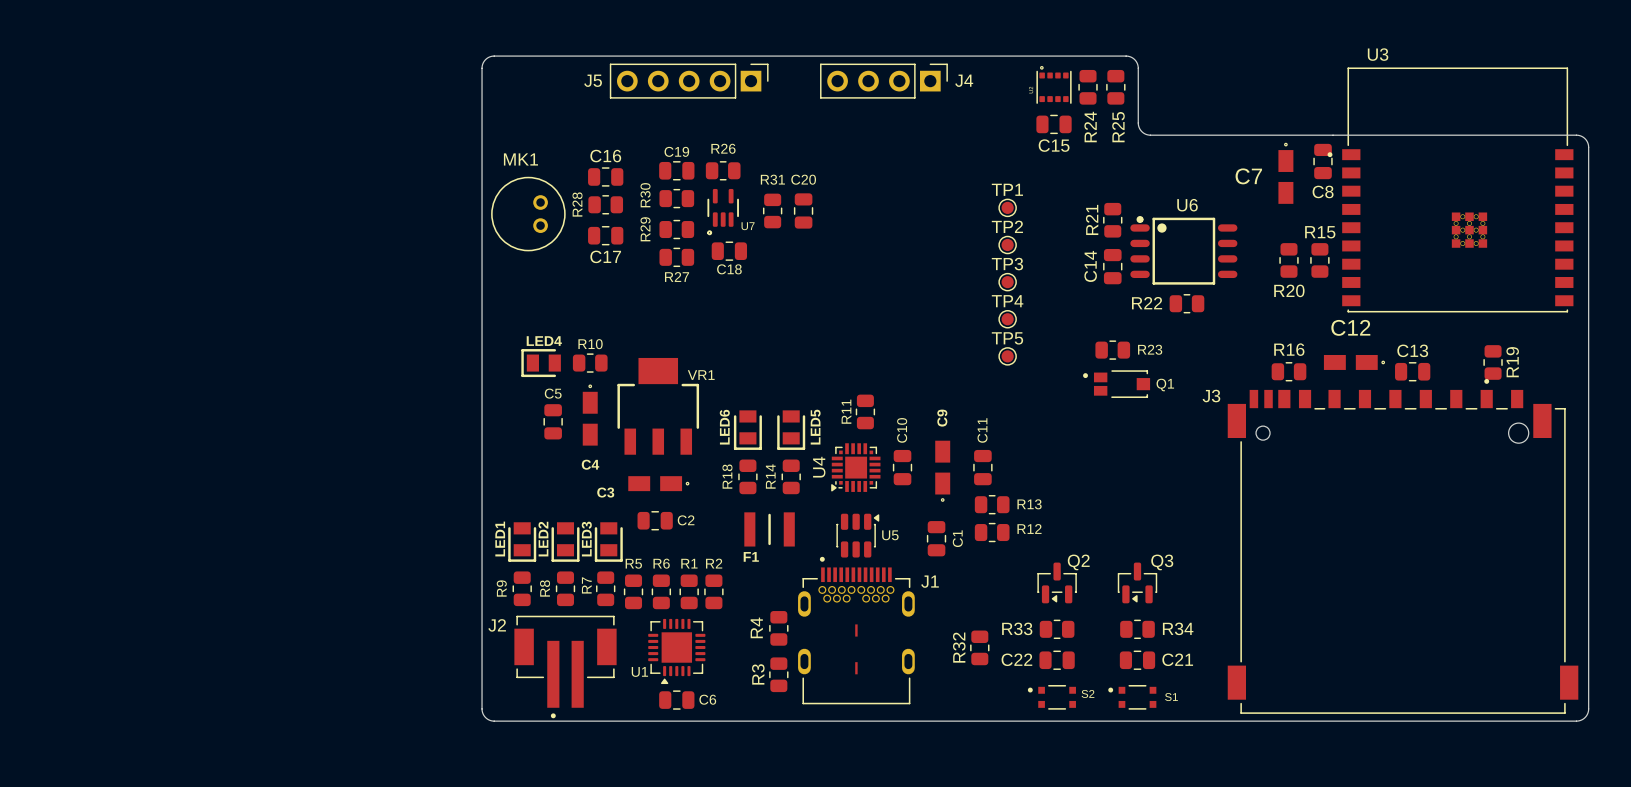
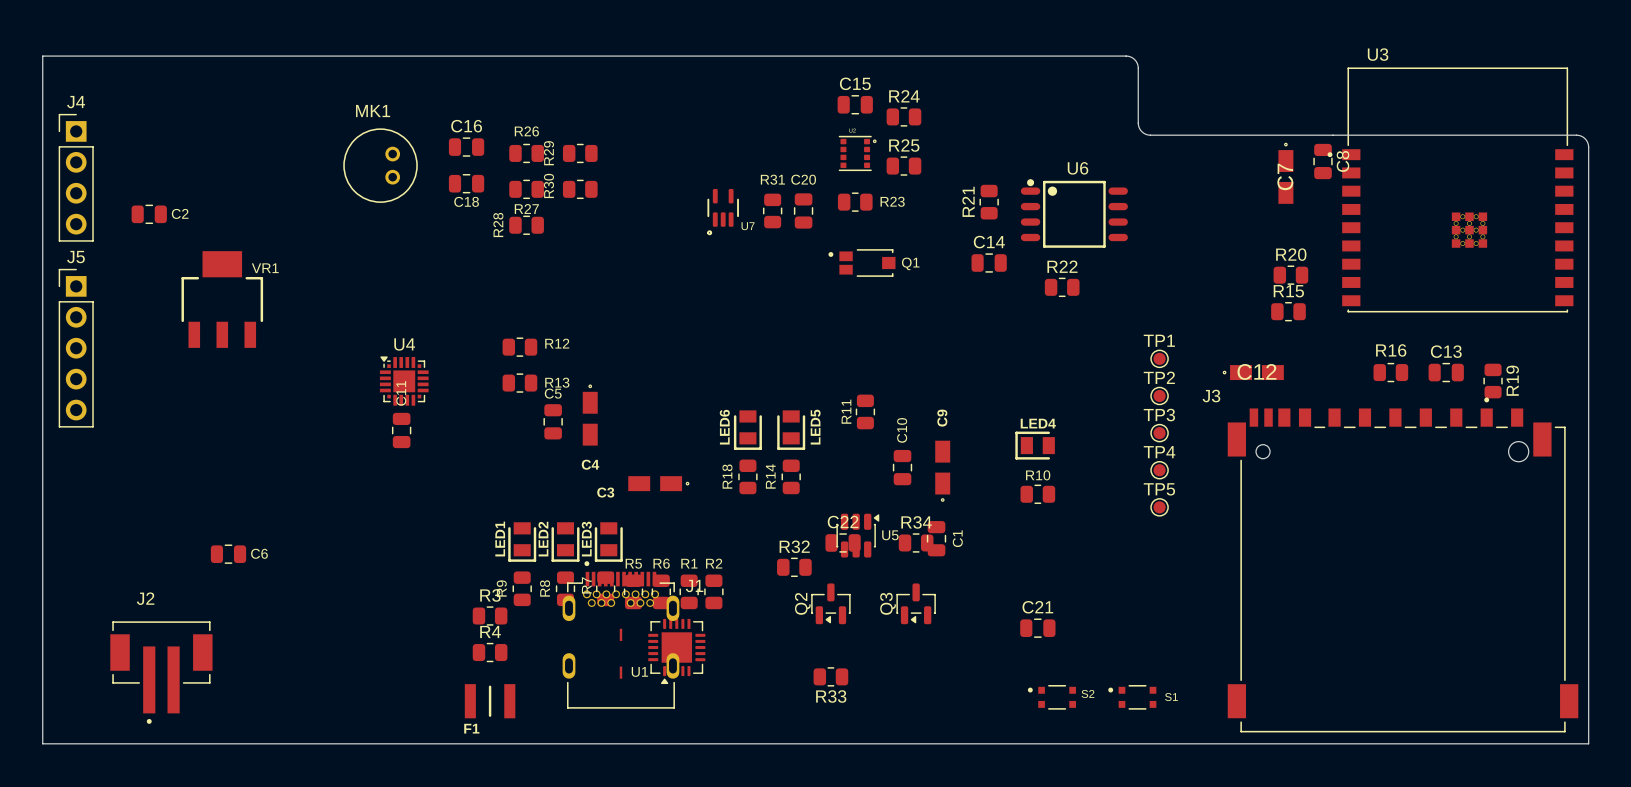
board edge: (494, 56) (485, 59) (482, 68) (482, 708) (487, 719) (494, 721) (1576, 721) (1585, 717) (1588, 708) -> (494, 56) (42, 56) (42, 743) (1588, 743) (1588, 708)
J5 name position: J5 (593, 80) -> J5 (75, 257)
J5 rotation: 0° (689, 81) -> 90° counterclockwise (76, 348)
J5 position: (689, 81) -> (76, 348)
J4 rotation: 0° (883, 81) -> 90° counterclockwise (76, 177)
J4 position: (883, 81) -> (76, 177)
part rotation: 0° (1054, 84) -> 90° clockwise (857, 153)
part position: (1054, 84) -> (857, 153)
R24 rotation: 0° (1088, 87) -> 90° clockwise (903, 116)
R24 position: (1088, 87) -> (903, 116)
R25 rotation: 0° (1115, 87) -> 90° clockwise (903, 166)
R25 position: (1115, 87) -> (903, 166)
C15 position: (1054, 124) -> (855, 104)
R24 name position: R24 (1090, 127) -> R24 (904, 96)
R25 name position: R25 (1118, 127) -> R25 (904, 145)
C15 name position: C15 (1054, 145) -> C15 (855, 83)
C19: (676, 170) -> none
R26 position: (723, 170) -> (526, 153)
C16 position: (605, 176) -> (466, 147)
C7 name rotation: 0° (1248, 176) -> 90° counterclockwise (1285, 176)
C8 name rotation: 0° (1323, 191) -> 90° counterclockwise (1342, 161)
C8 name position: C8 (1323, 191) -> C8 (1342, 161)
R30 position: (676, 198) -> (580, 189)
R28 position: (605, 204) -> (526, 225)
TP1 position: (1007, 207) -> (1159, 358)
MK1 position: (528, 214) -> (380, 165)
R21 position: (1112, 220) -> (989, 202)
R29 position: (676, 229) -> (580, 153)
C17: (605, 235) -> none
TP2 position: (1007, 245) -> (1159, 395)
U6 position: (1183, 250) -> (1074, 213)
C18 position: (729, 251) -> (466, 183)
R27 position: (676, 257) -> (526, 189)
R20 rotation: 0° (1288, 260) -> 90° clockwise (1290, 275)
R15 rotation: 0° (1319, 260) -> 90° clockwise (1288, 311)
R15 position: (1319, 260) -> (1288, 311)
C14 rotation: 0° (1112, 266) -> 90° clockwise (989, 263)
C14 position: (1112, 266) -> (989, 263)
TP3 position: (1007, 282) -> (1159, 433)
R20 name position: R20 (1289, 290) -> R20 (1291, 254)
R22 name position: R22 (1147, 303) -> R22 (1062, 266)
R22 position: (1186, 303) -> (1062, 287)
TP4 position: (1007, 319) -> (1159, 470)
C12 name position: C12 (1350, 327) -> C12 (1256, 371)
R23 position: (1112, 350) -> (855, 202)
TP5 position: (1007, 356) -> (1159, 507)
C12 rotation: 0° (1354, 362) -> 180° (1253, 372)
C12 position: (1354, 362) -> (1253, 372)
R19 position: (1493, 362) -> (1493, 381)
LED4 position: (541, 363) -> (1035, 445)
R10 position: (590, 363) -> (1037, 494)
R16 position: (1288, 371) -> (1390, 372)
C13 position: (1412, 371) -> (1446, 372)
Q1 position: (1116, 384) -> (861, 263)
VR1 position: (658, 406) -> (222, 299)
U4 rotation: 0° (855, 467) -> 90° clockwise (404, 381)
U4 position: (855, 467) -> (404, 381)
C11 position: (982, 467) -> (401, 430)
R13 position: (992, 504) -> (519, 383)
C2 position: (655, 520) -> (149, 214)
F1 position: (769, 529) -> (490, 701)
R12 position: (992, 532) -> (519, 347)
J3 position: (1403, 546) -> (1403, 564)
Q2 name rotation: 0° (1078, 562) -> 90° counterclockwise (802, 603)
Q2 name position: Q2 (1078, 562) -> Q2 (802, 603)
Q3 name rotation: 0° (1162, 562) -> 90° counterclockwise (888, 603)
Q3 name position: Q3 (1162, 562) -> Q3 (888, 603)
Q2 position: (1057, 582) -> (830, 603)
Q3 position: (1137, 582) -> (916, 603)
J2 name position: J2 (497, 625) -> J2 (145, 598)
R4 rotation: 0° (778, 628) -> 90° clockwise (490, 652)
R4 position: (778, 628) -> (490, 652)
R33 name position: R33 (1017, 628) -> R33 (831, 696)
R34 name position: R34 (1178, 628) -> R34 (916, 522)
R33 position: (1057, 629) -> (830, 676)
R34 position: (1137, 629) -> (916, 542)
J1 position: (856, 630) -> (620, 634)
R32 rotation: 0° (979, 647) -> 90° clockwise (794, 567)
R32 position: (979, 647) -> (794, 567)
C22 name position: C22 (1016, 659) -> C22 (843, 522)
C21 name position: C21 (1177, 659) -> C21 (1037, 607)
C22 position: (1057, 660) -> (843, 542)
C21 position: (1137, 660) -> (1037, 628)
J2 position: (565, 666) -> (161, 672)
R3 rotation: 0° (778, 674) -> 90° clockwise (490, 616)
R3 position: (778, 674) -> (490, 616)
C6 position: (676, 700) -> (228, 554)

